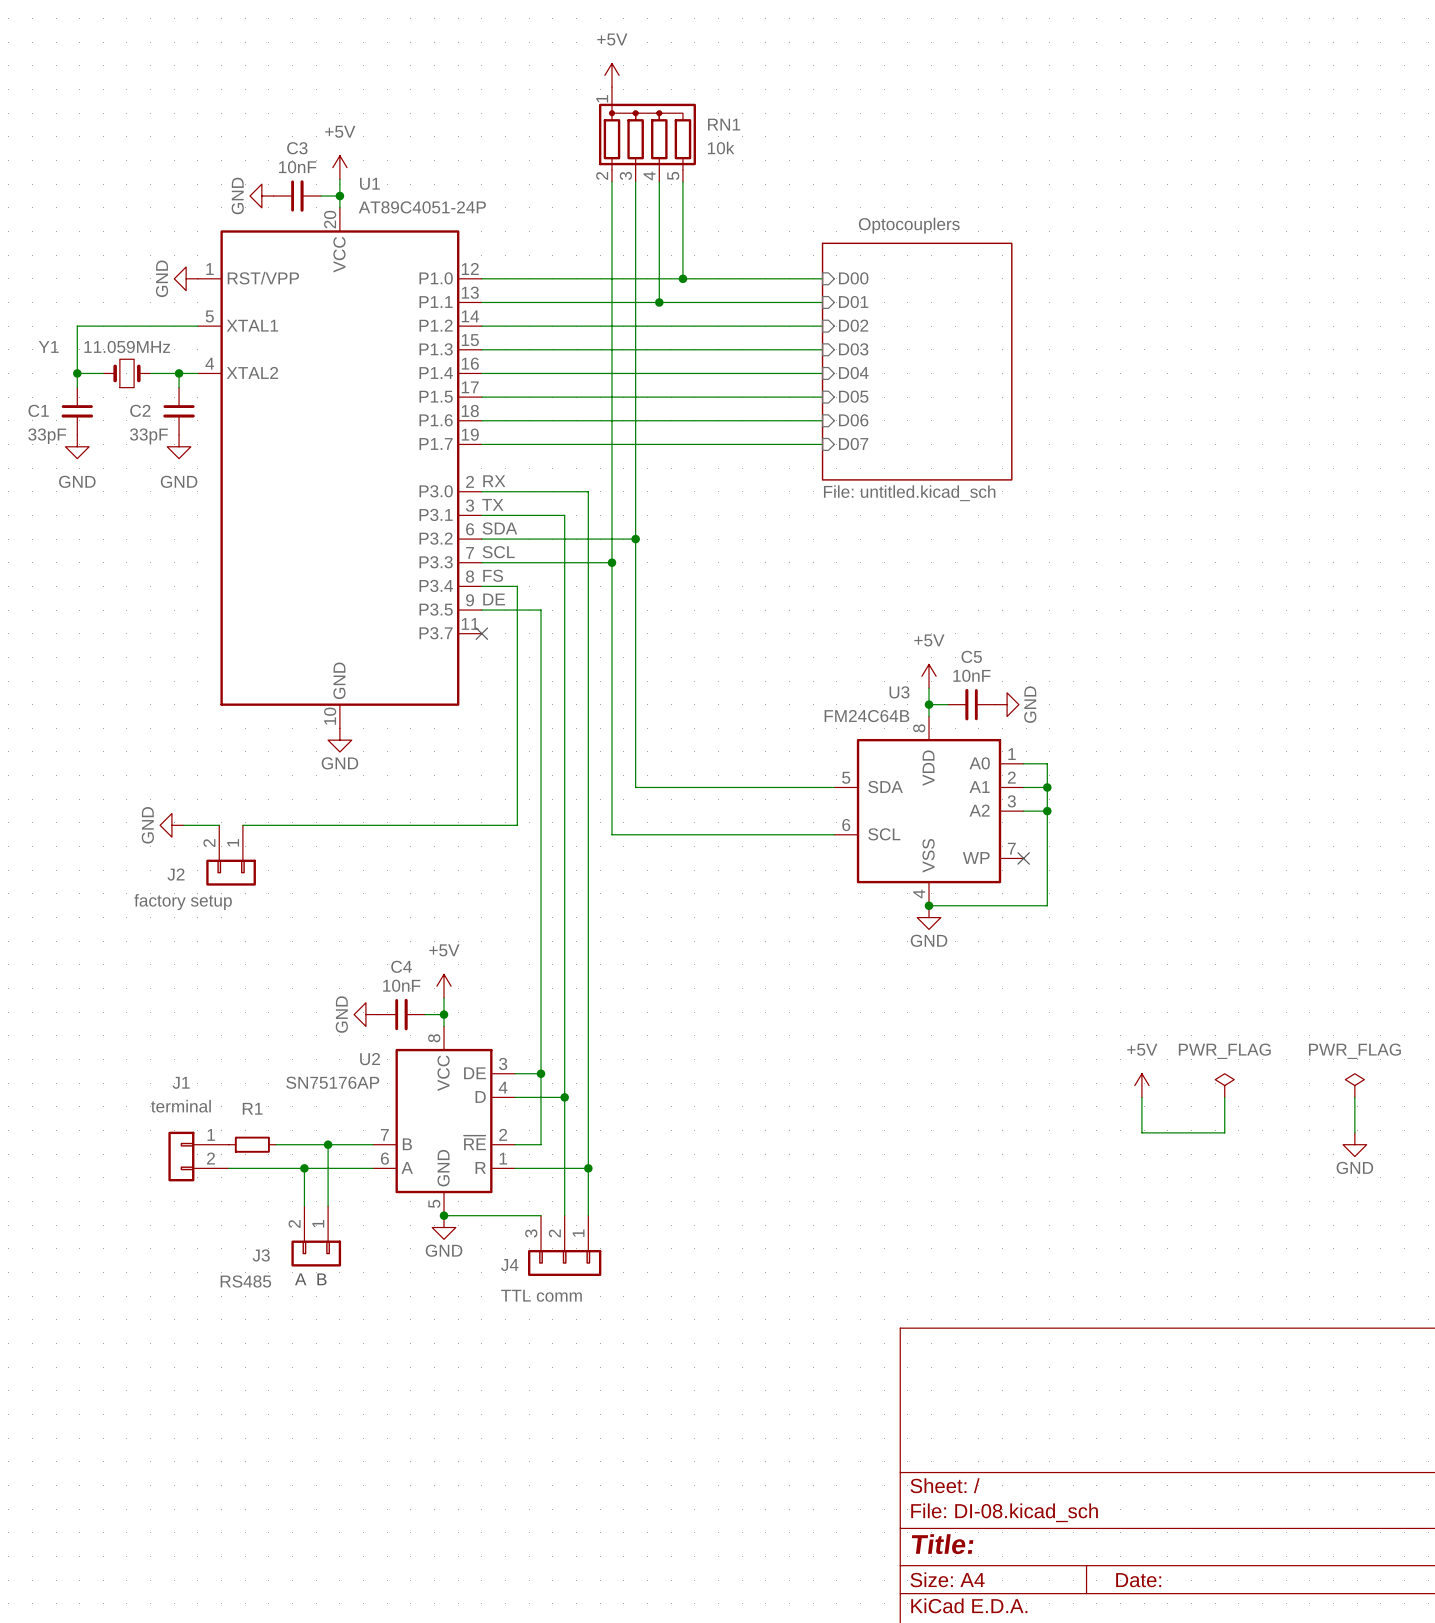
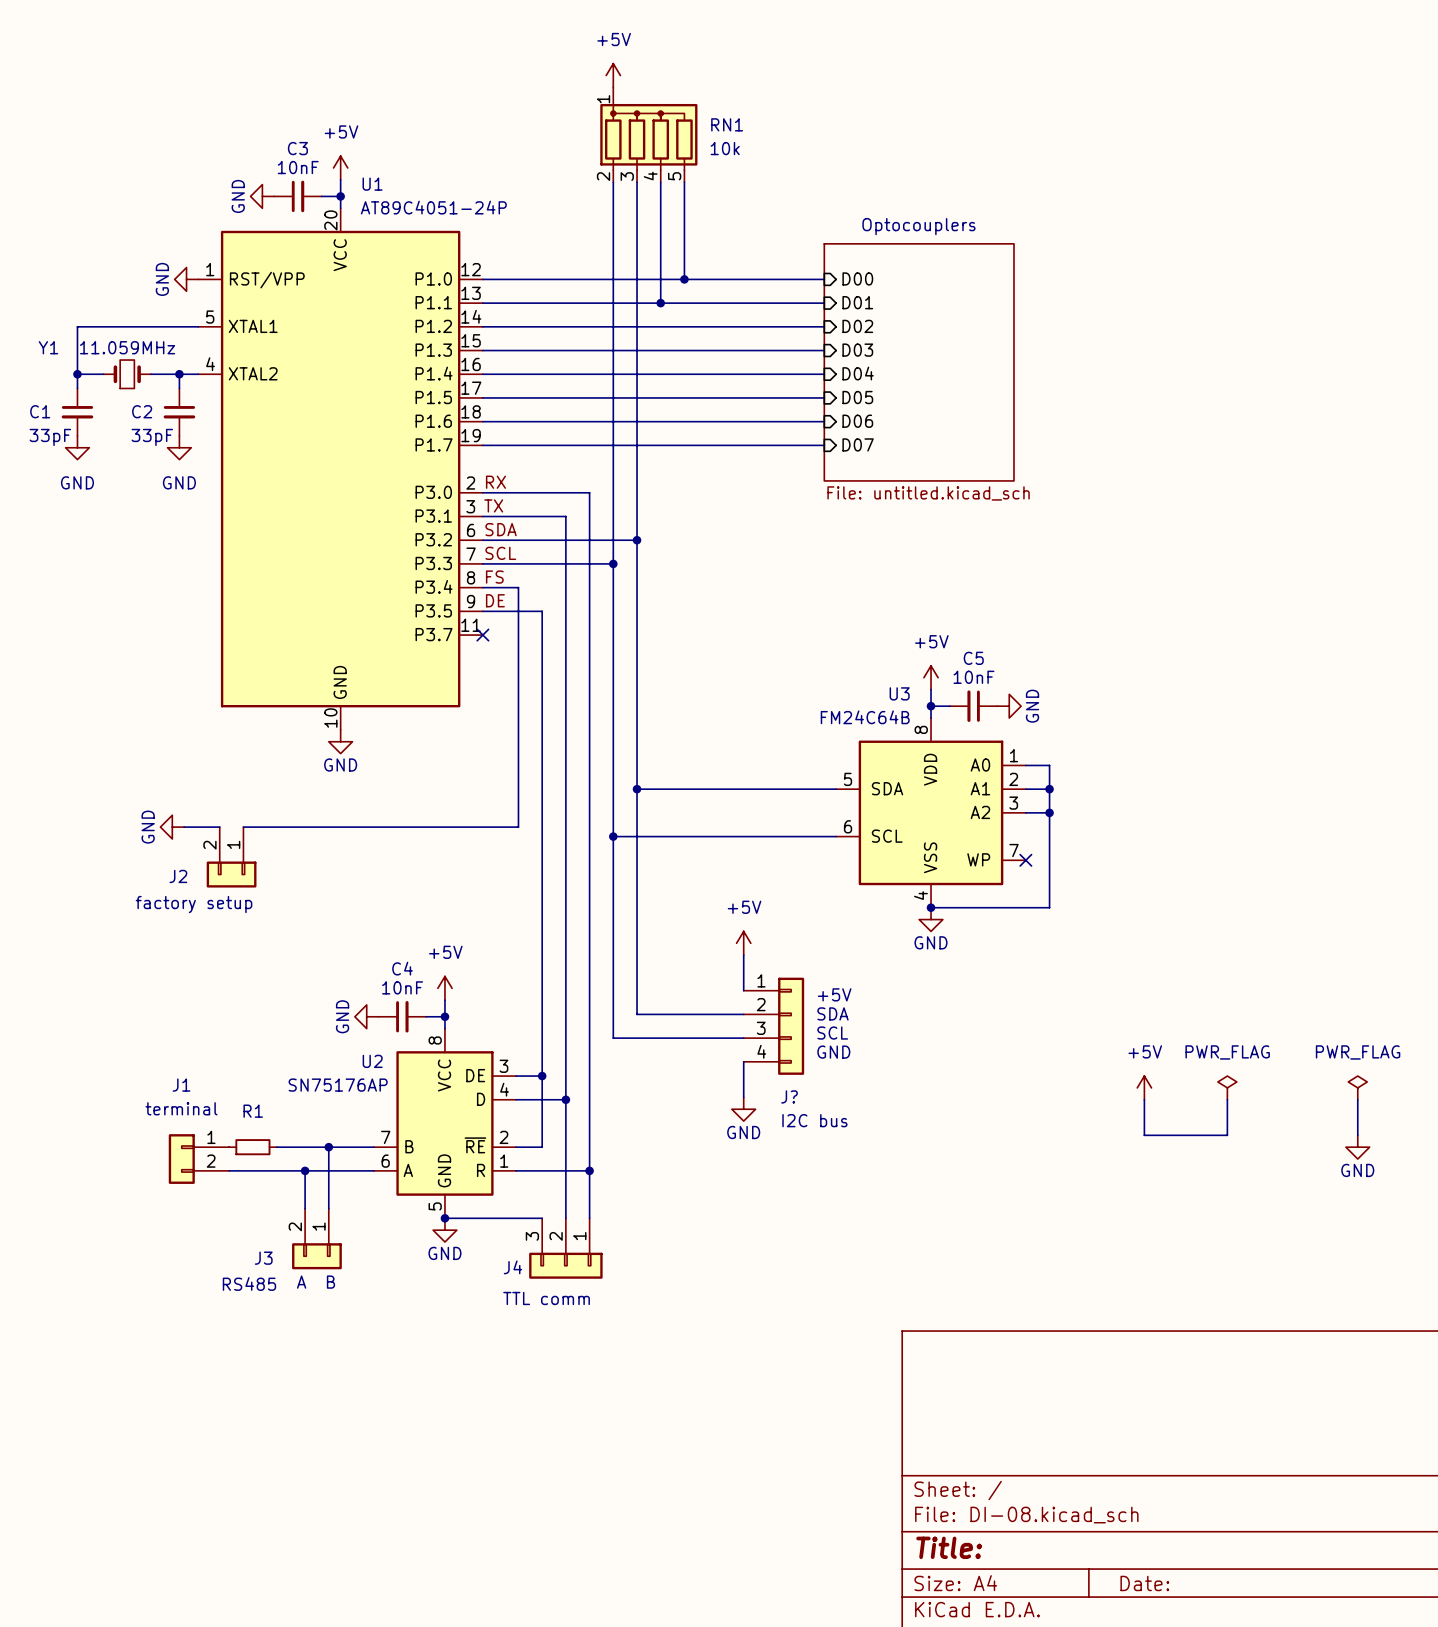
wire: none -> (637, 789) (637, 1014) (743, 1014)
junction: none -> (637, 789)
wire: none -> (613, 836) (613, 1038) (743, 1038)
junction: none -> (613, 836)
power symbol: none -> +5V (743, 943)
wire: none -> (743, 955) (743, 990)
text: none -> +5V (834, 994)
text: none -> SDA (832, 1013)
J?: none -> I2C bus (773, 1026)
text: none -> SCL (832, 1033)
text: none -> GND (833, 1052)
wire: none -> (743, 1061) (743, 1097)
power symbol: none -> GND (743, 1109)

